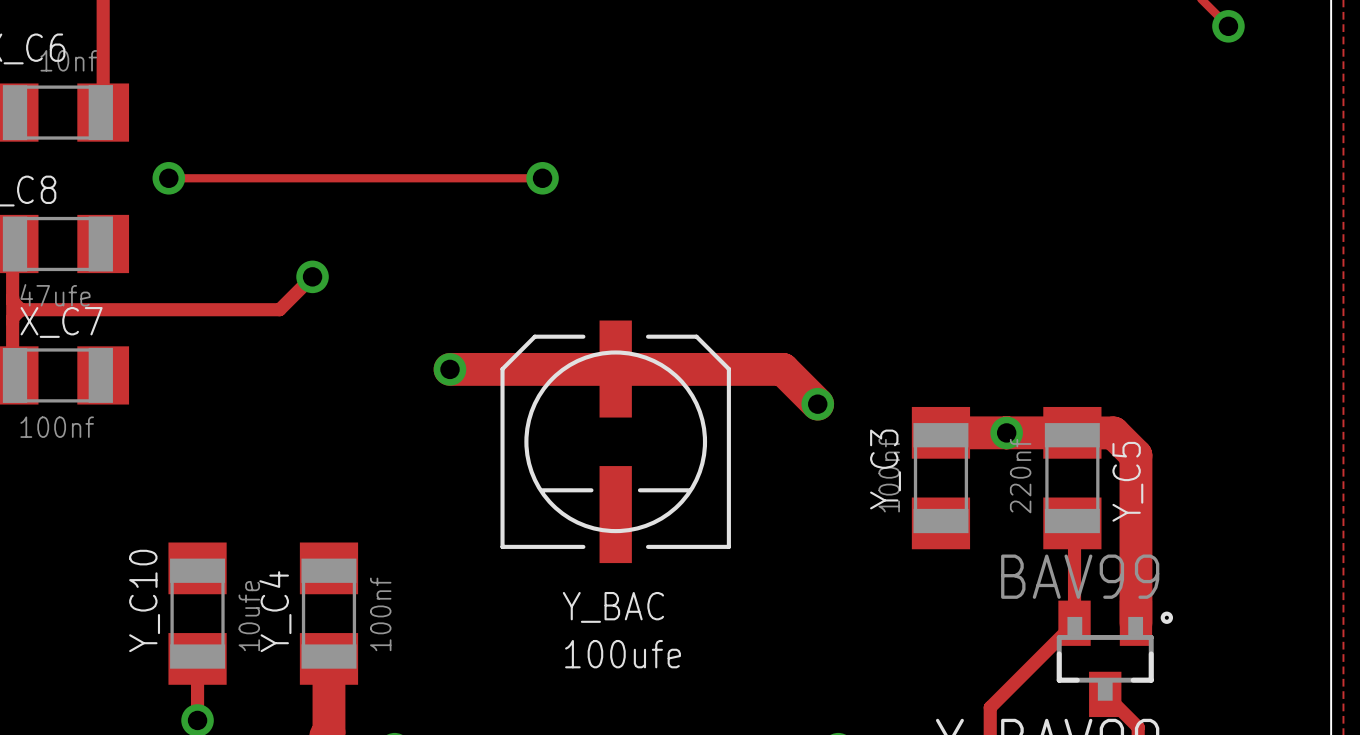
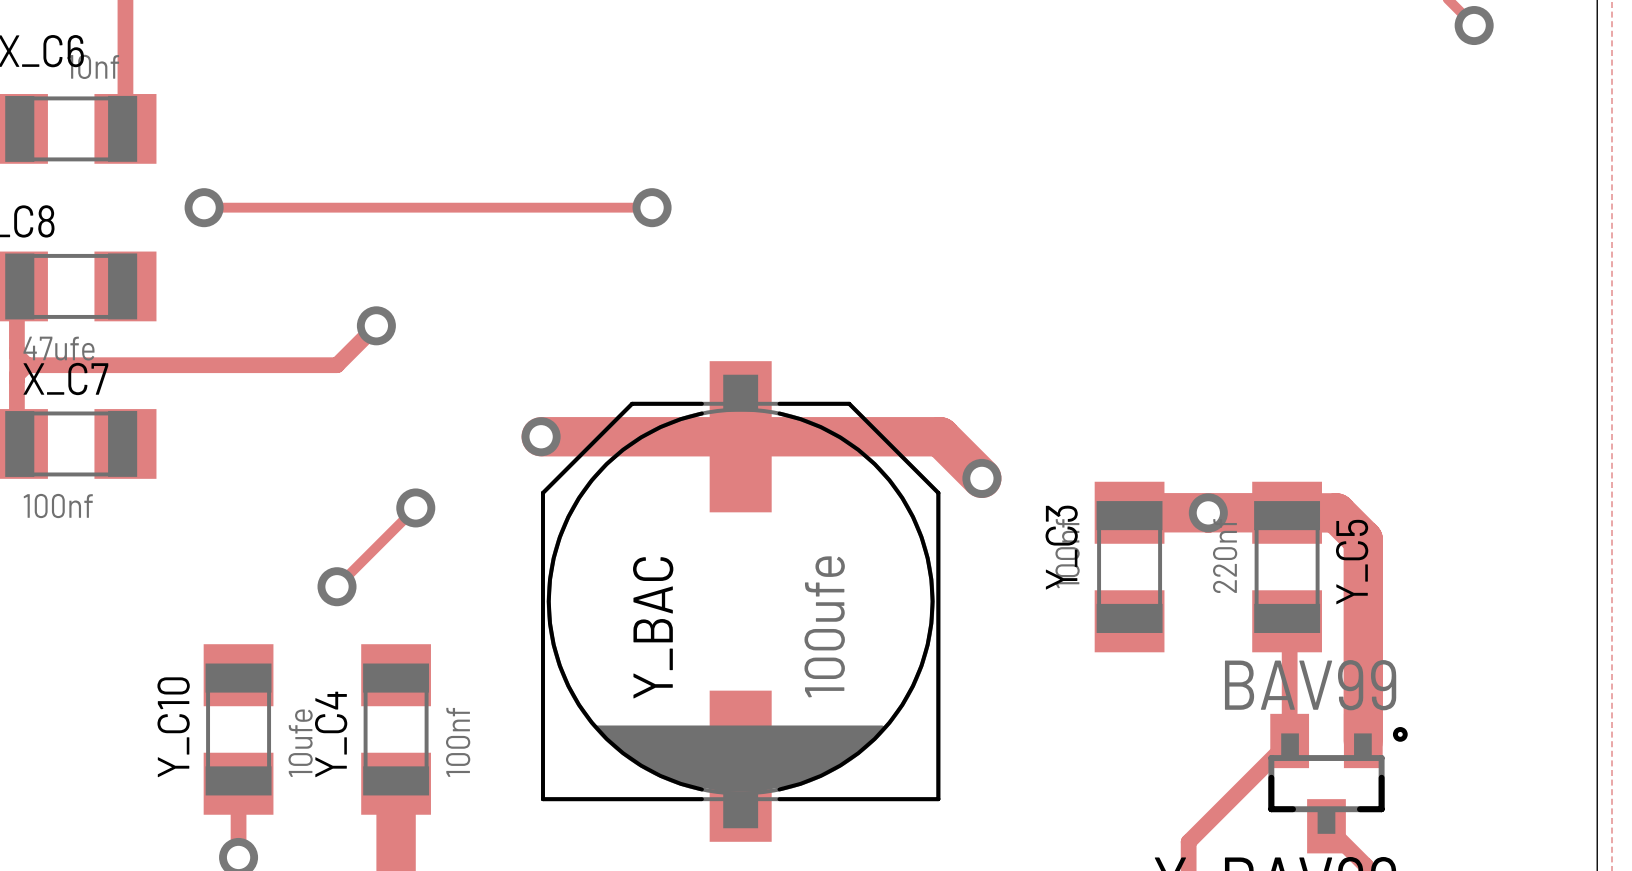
track: none -> (415, 507) (337, 586)
via: none -> (415, 507)
Y_BAC: 100ufe (615, 441) -> none
via: none -> (337, 586)
Y_BAC: none -> 100ufe (740, 601)

